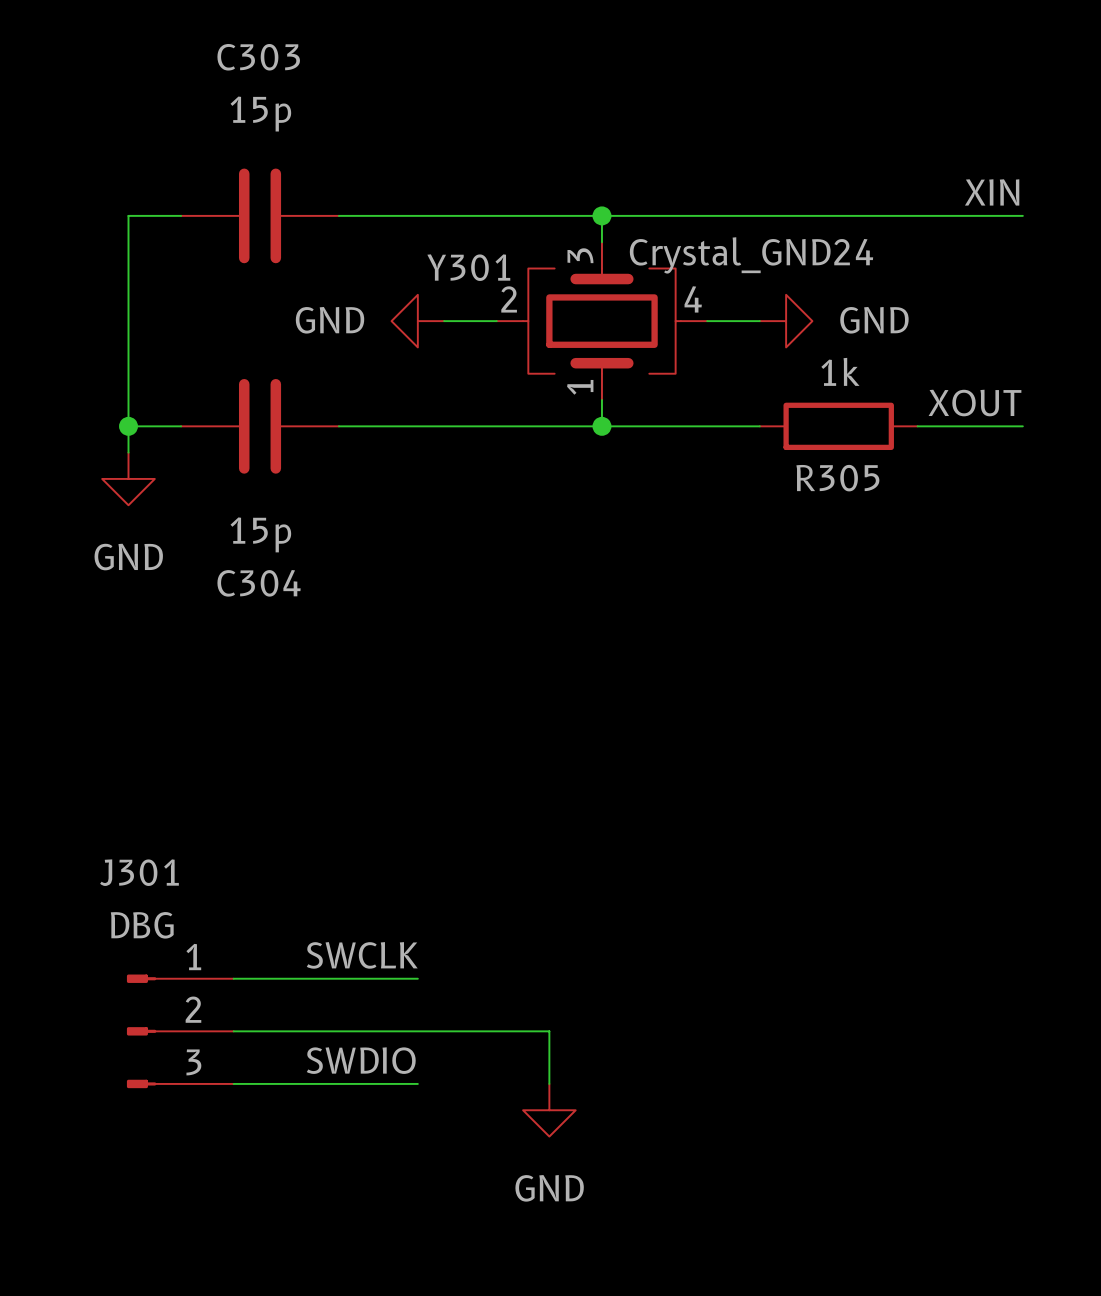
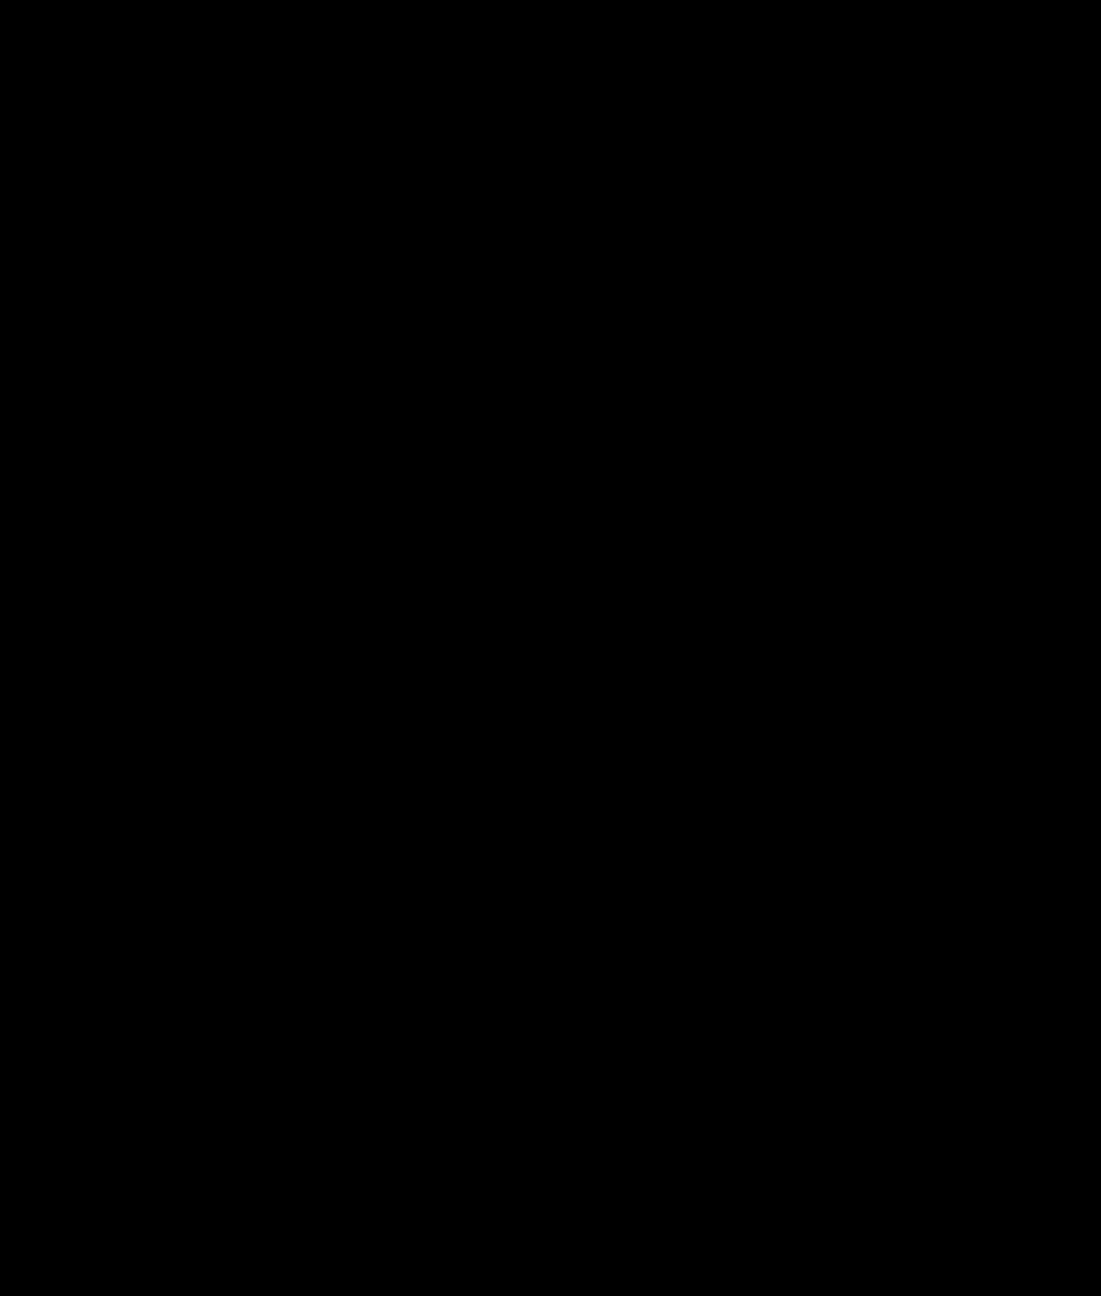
label: XIN (992, 192) -> none
wire: (181, 215) (128, 215) (128, 452) -> none
C303: 15p (260, 215) -> none
wire: (338, 215) (1022, 215) -> none
wire: (601, 215) (601, 242) -> none
junction: (601, 215) -> none
power symbol: GND (417, 321) -> none
wire: (444, 321) (496, 321) -> none
Y301: Crystal_GND24 (601, 321) -> none
wire: (707, 321) (759, 321) -> none
power symbol: GND (786, 321) -> none
wire: (601, 400) (601, 426) -> none
label: XOUT (974, 403) -> none
wire: (128, 426) (181, 426) -> none
junction: (128, 426) -> none
C304: 15p (260, 426) -> none
wire: (338, 426) (759, 426) -> none
junction: (601, 426) -> none
R305: 1k (838, 426) -> none
wire: (917, 426) (1022, 426) -> none
power symbol: GND (128, 478) -> none
label: SWCLK (362, 955) -> none
wire: (233, 978) (417, 978) -> none
J301: DBG (180, 1031) -> none
wire: (233, 1031) (549, 1031) (549, 1083) -> none
label: SWDIO (361, 1060) -> none
wire: (233, 1083) (417, 1083) -> none
power symbol: GND (549, 1110) -> none

